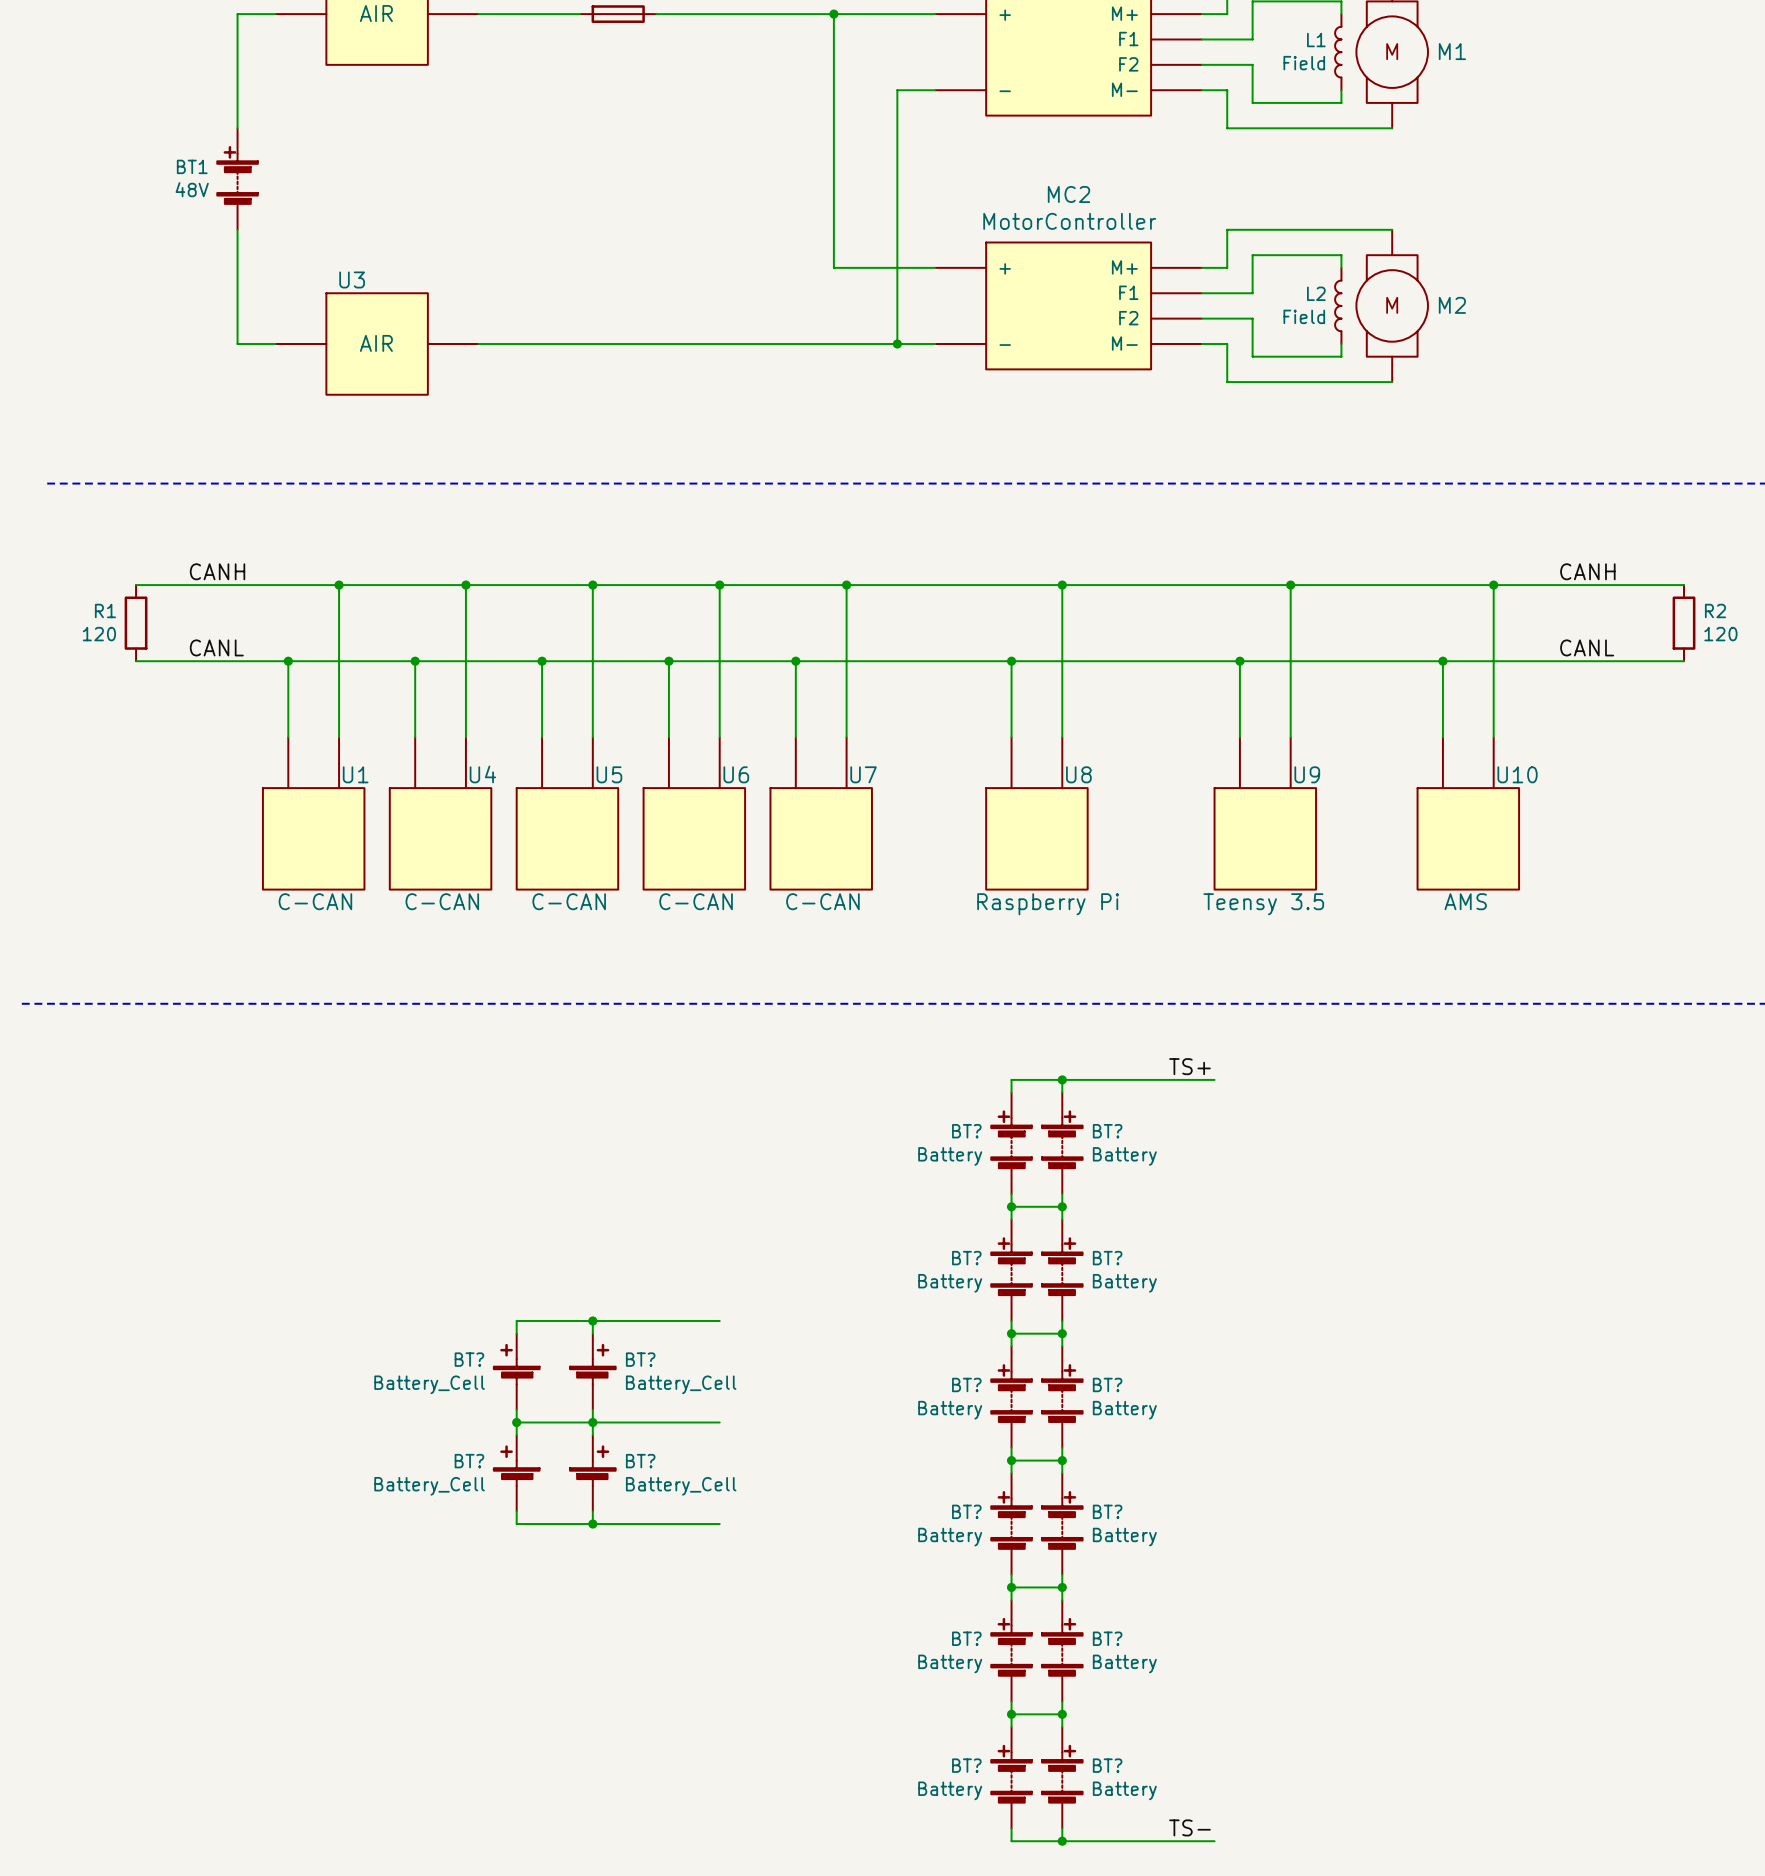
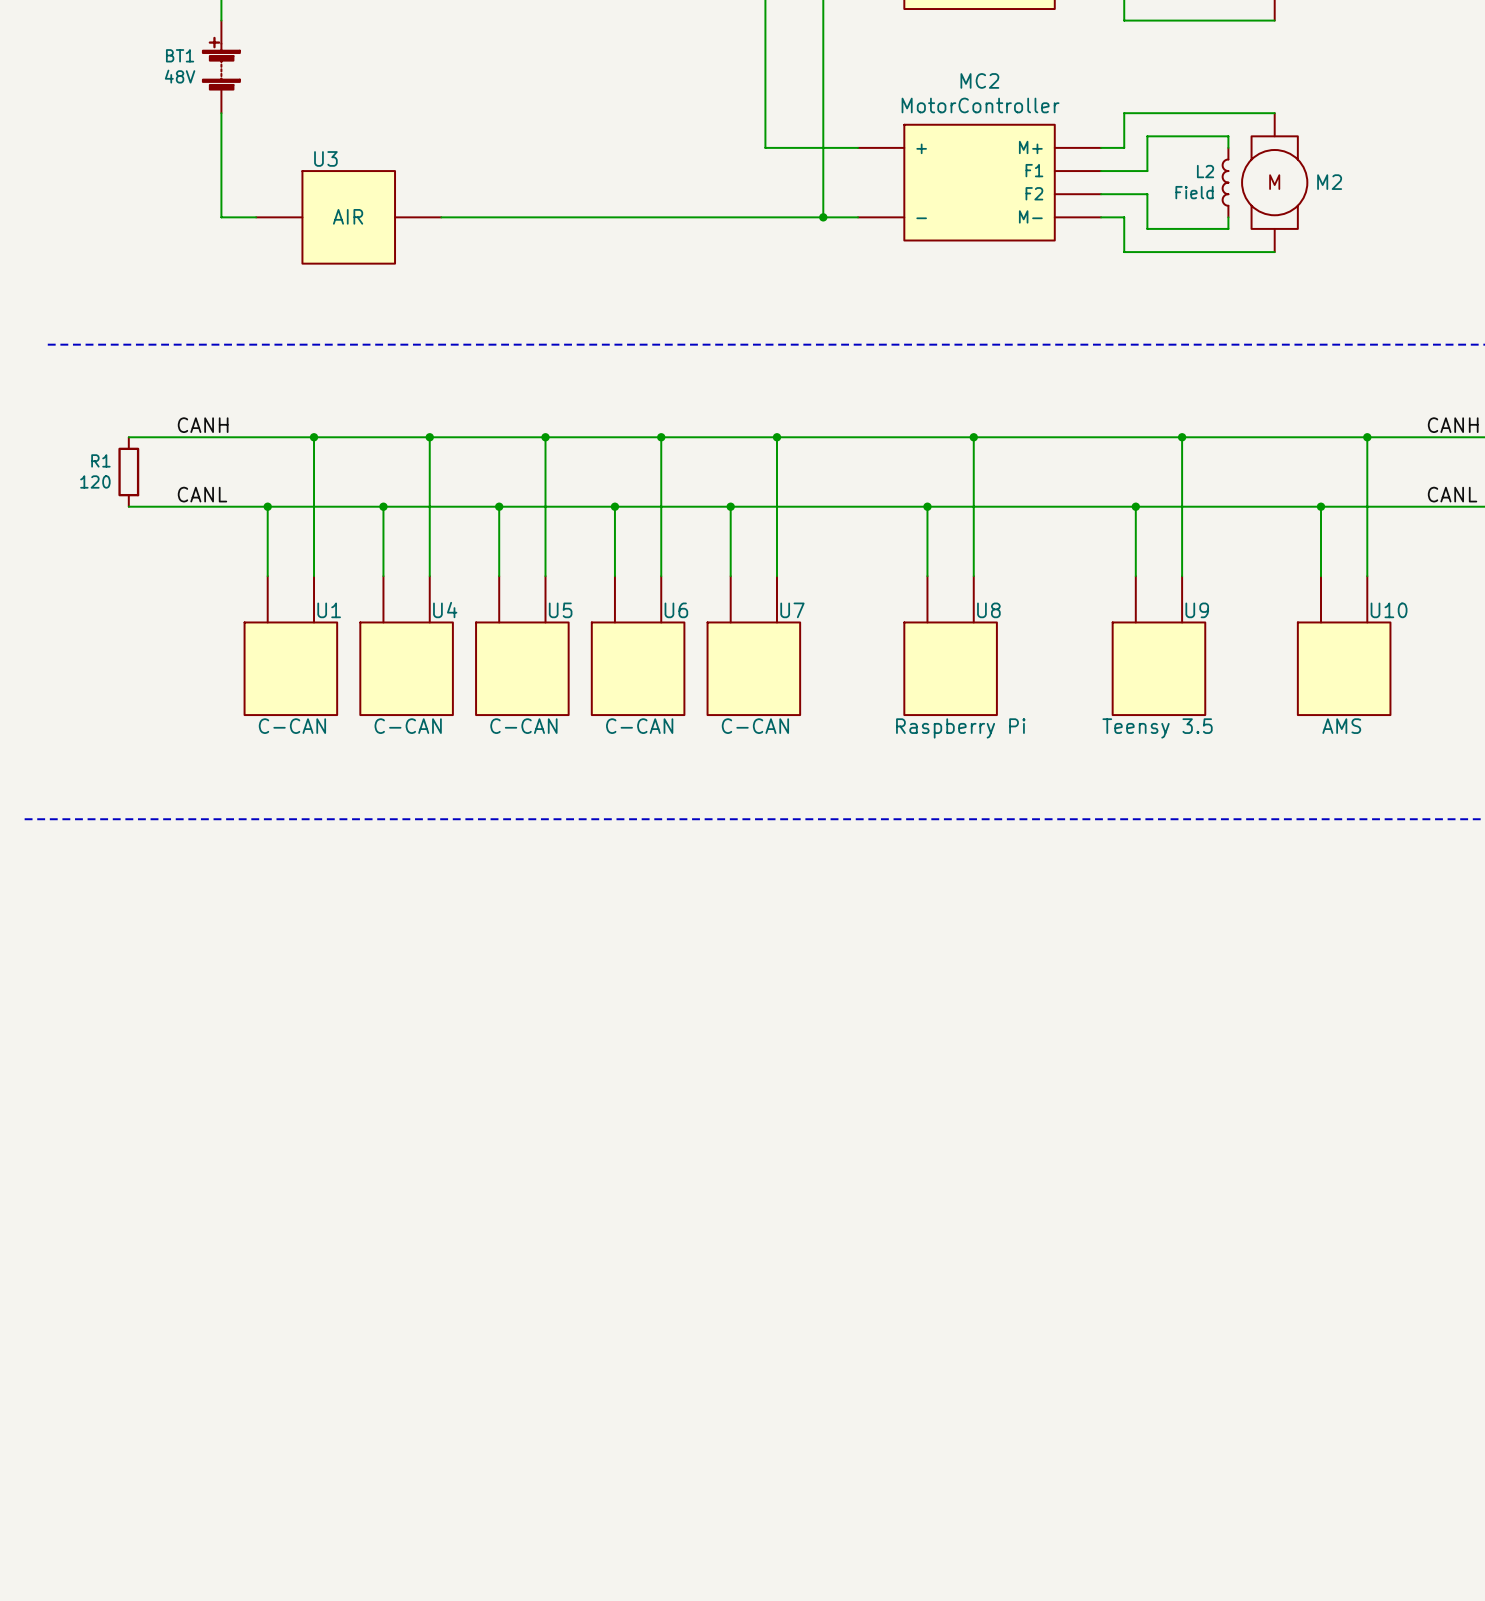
label: TS+ (1189, 1066) -> none
wire: (1062, 1079) (1062, 1092) -> none
junction: (1062, 1079) -> none
wire: (1214, 1079) (1011, 1079) (1011, 1092) -> none
BT?: Battery (1011, 1143) -> none
BT?: Battery (1062, 1143) -> none
wire: (1011, 1194) (1011, 1219) -> none
wire: (1062, 1194) (1062, 1219) -> none
wire: (1011, 1206) (1062, 1206) -> none
junction: (1011, 1206) -> none
junction: (1062, 1206) -> none
BT?: Battery (1011, 1270) -> none
BT?: Battery (1062, 1270) -> none
wire: (592, 1320) (592, 1333) -> none
junction: (592, 1320) -> none
wire: (719, 1320) (516, 1320) (516, 1333) -> none
wire: (1011, 1320) (1011, 1346) -> none
wire: (1062, 1320) (1062, 1346) -> none
wire: (1011, 1333) (1062, 1333) -> none
junction: (1011, 1333) -> none
junction: (1062, 1333) -> none
BT?: Battery_Cell (516, 1371) -> none
BT?: Battery_Cell (592, 1371) -> none
BT?: Battery (1011, 1397) -> none
BT?: Battery (1062, 1397) -> none
wire: (516, 1409) (516, 1435) -> none
wire: (592, 1409) (592, 1435) -> none
wire: (516, 1422) (719, 1422) -> none
junction: (516, 1422) -> none
junction: (592, 1422) -> none
wire: (1011, 1447) (1011, 1473) -> none
wire: (1062, 1447) (1062, 1473) -> none
wire: (1011, 1460) (1062, 1460) -> none
junction: (1011, 1460) -> none
junction: (1062, 1460) -> none
BT?: Battery_Cell (516, 1473) -> none
BT?: Battery_Cell (592, 1473) -> none
wire: (516, 1511) (516, 1524) (719, 1524) -> none
wire: (592, 1511) (592, 1524) -> none
junction: (592, 1524) -> none
BT?: Battery (1011, 1524) -> none
BT?: Battery (1062, 1524) -> none
wire: (1011, 1574) (1011, 1600) -> none
wire: (1062, 1574) (1062, 1600) -> none
wire: (1011, 1587) (1062, 1587) -> none
junction: (1011, 1587) -> none
junction: (1062, 1587) -> none
BT?: Battery (1011, 1650) -> none
BT?: Battery (1062, 1650) -> none
wire: (1011, 1701) (1011, 1727) -> none
wire: (1062, 1701) (1062, 1727) -> none
wire: (1011, 1714) (1062, 1714) -> none
junction: (1011, 1714) -> none
junction: (1062, 1714) -> none
BT?: Battery (1011, 1777) -> none
BT?: Battery (1062, 1777) -> none
label: TS- (1189, 1827) -> none
wire: (1011, 1828) (1011, 1841) (1214, 1841) -> none
wire: (1062, 1828) (1062, 1841) -> none
junction: (1062, 1841) -> none

